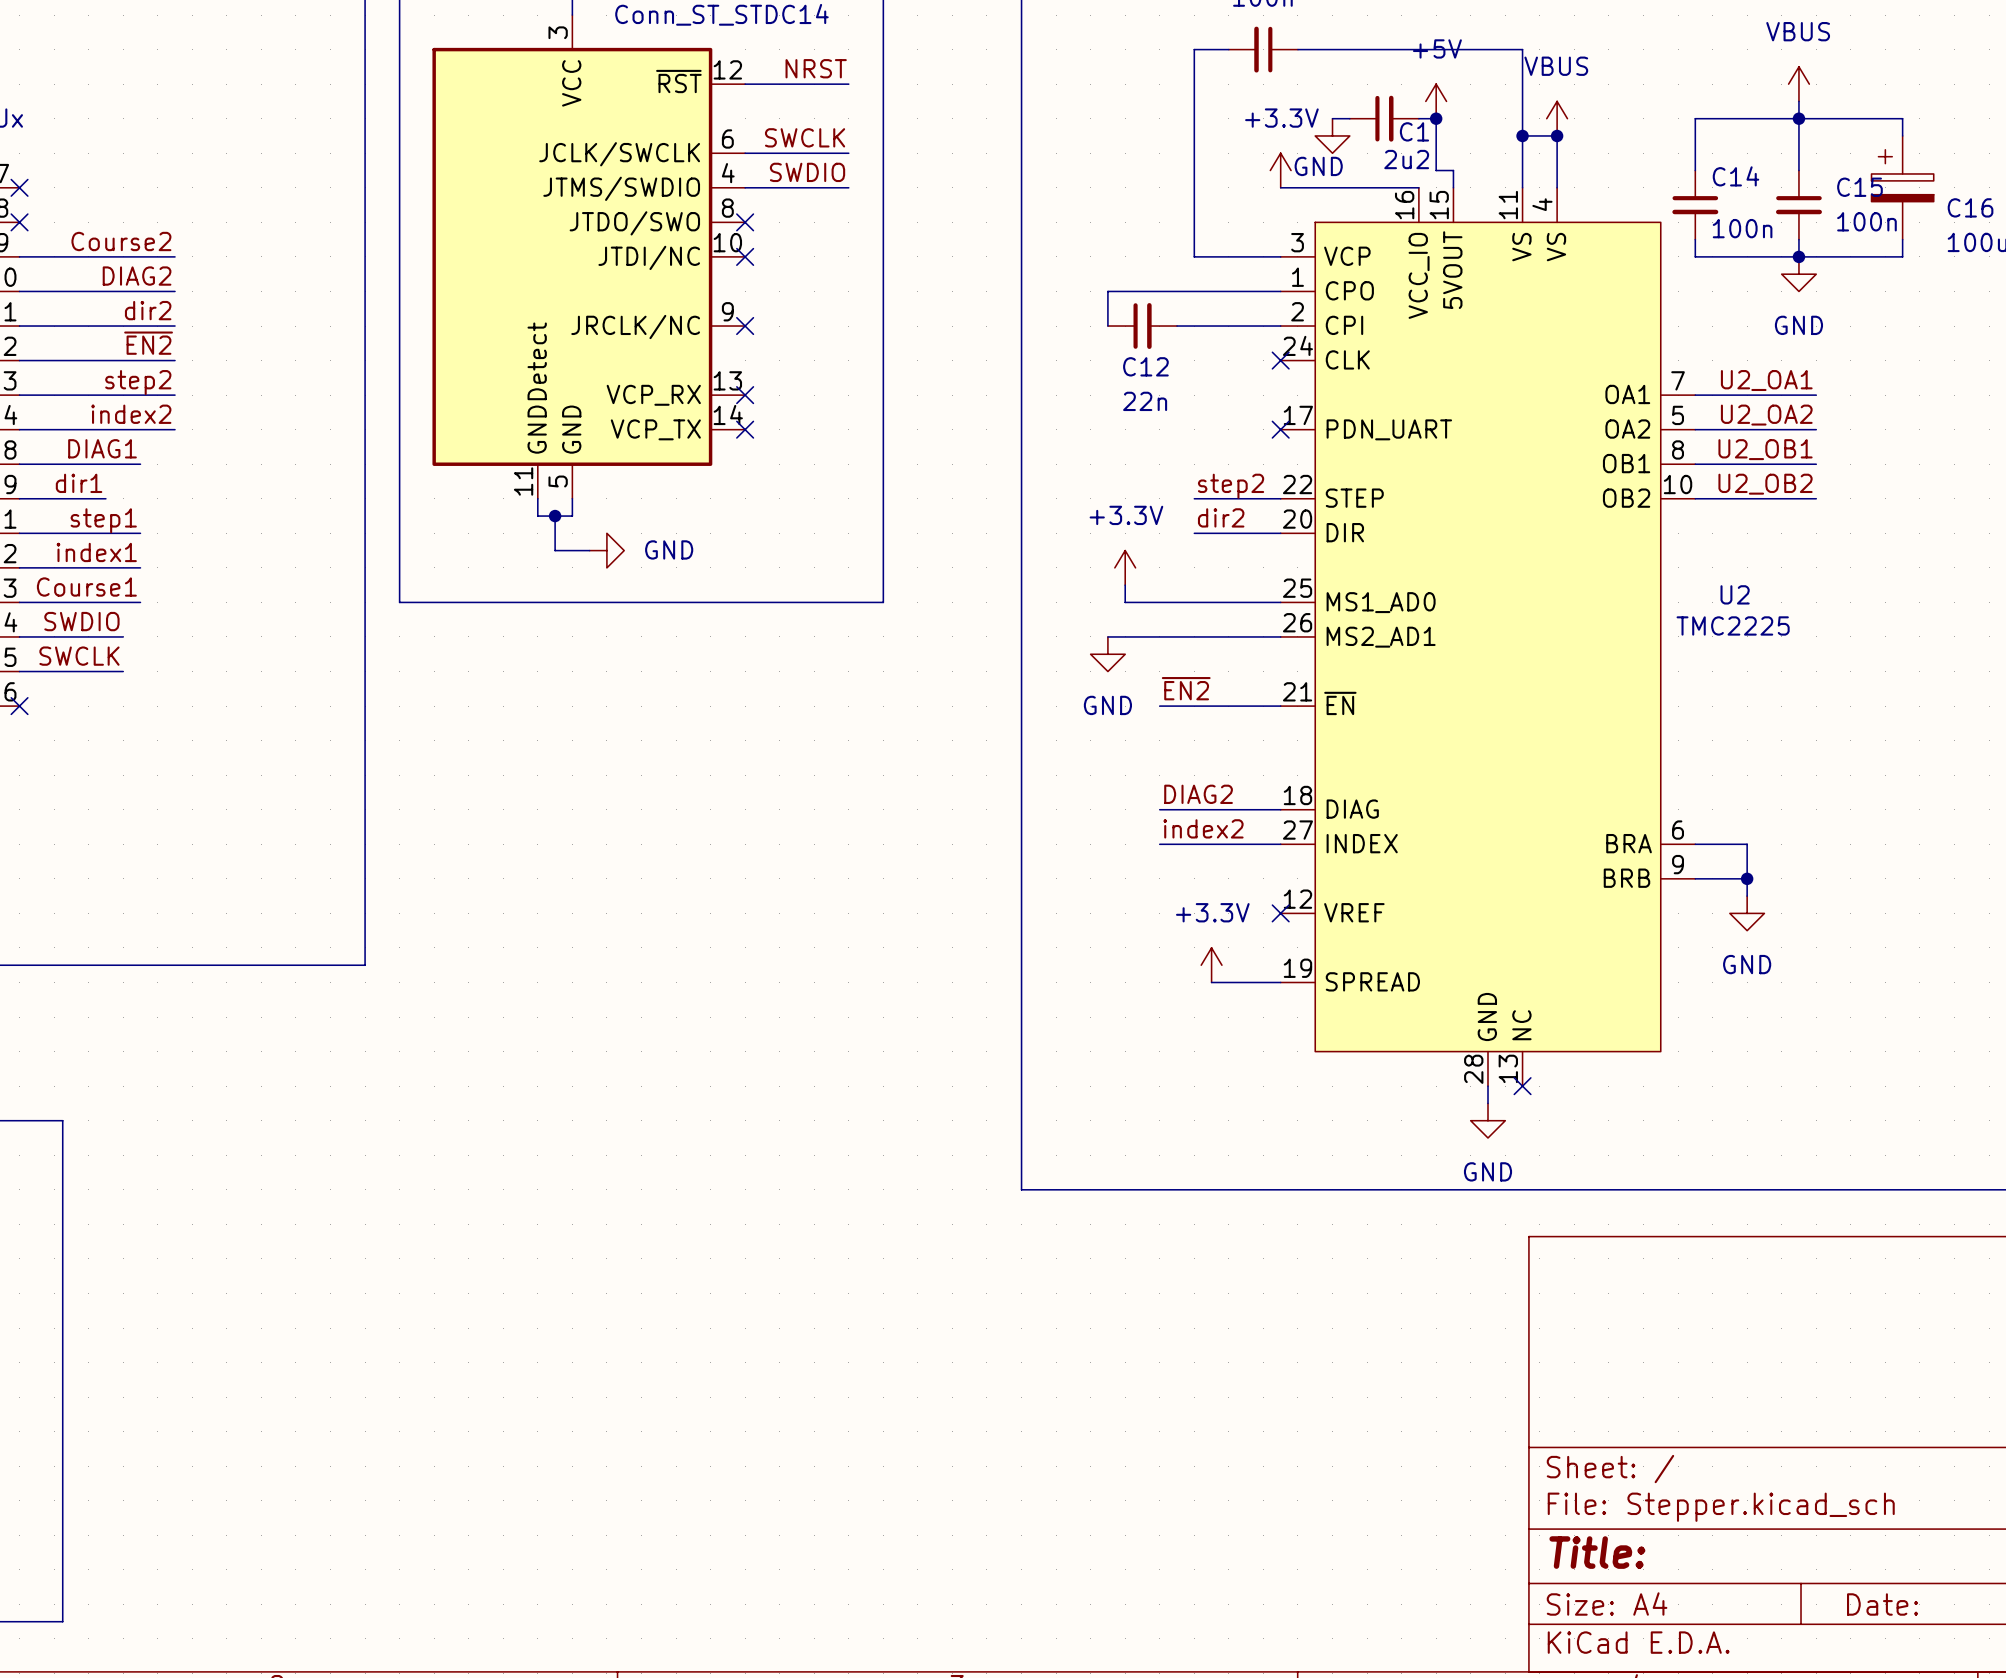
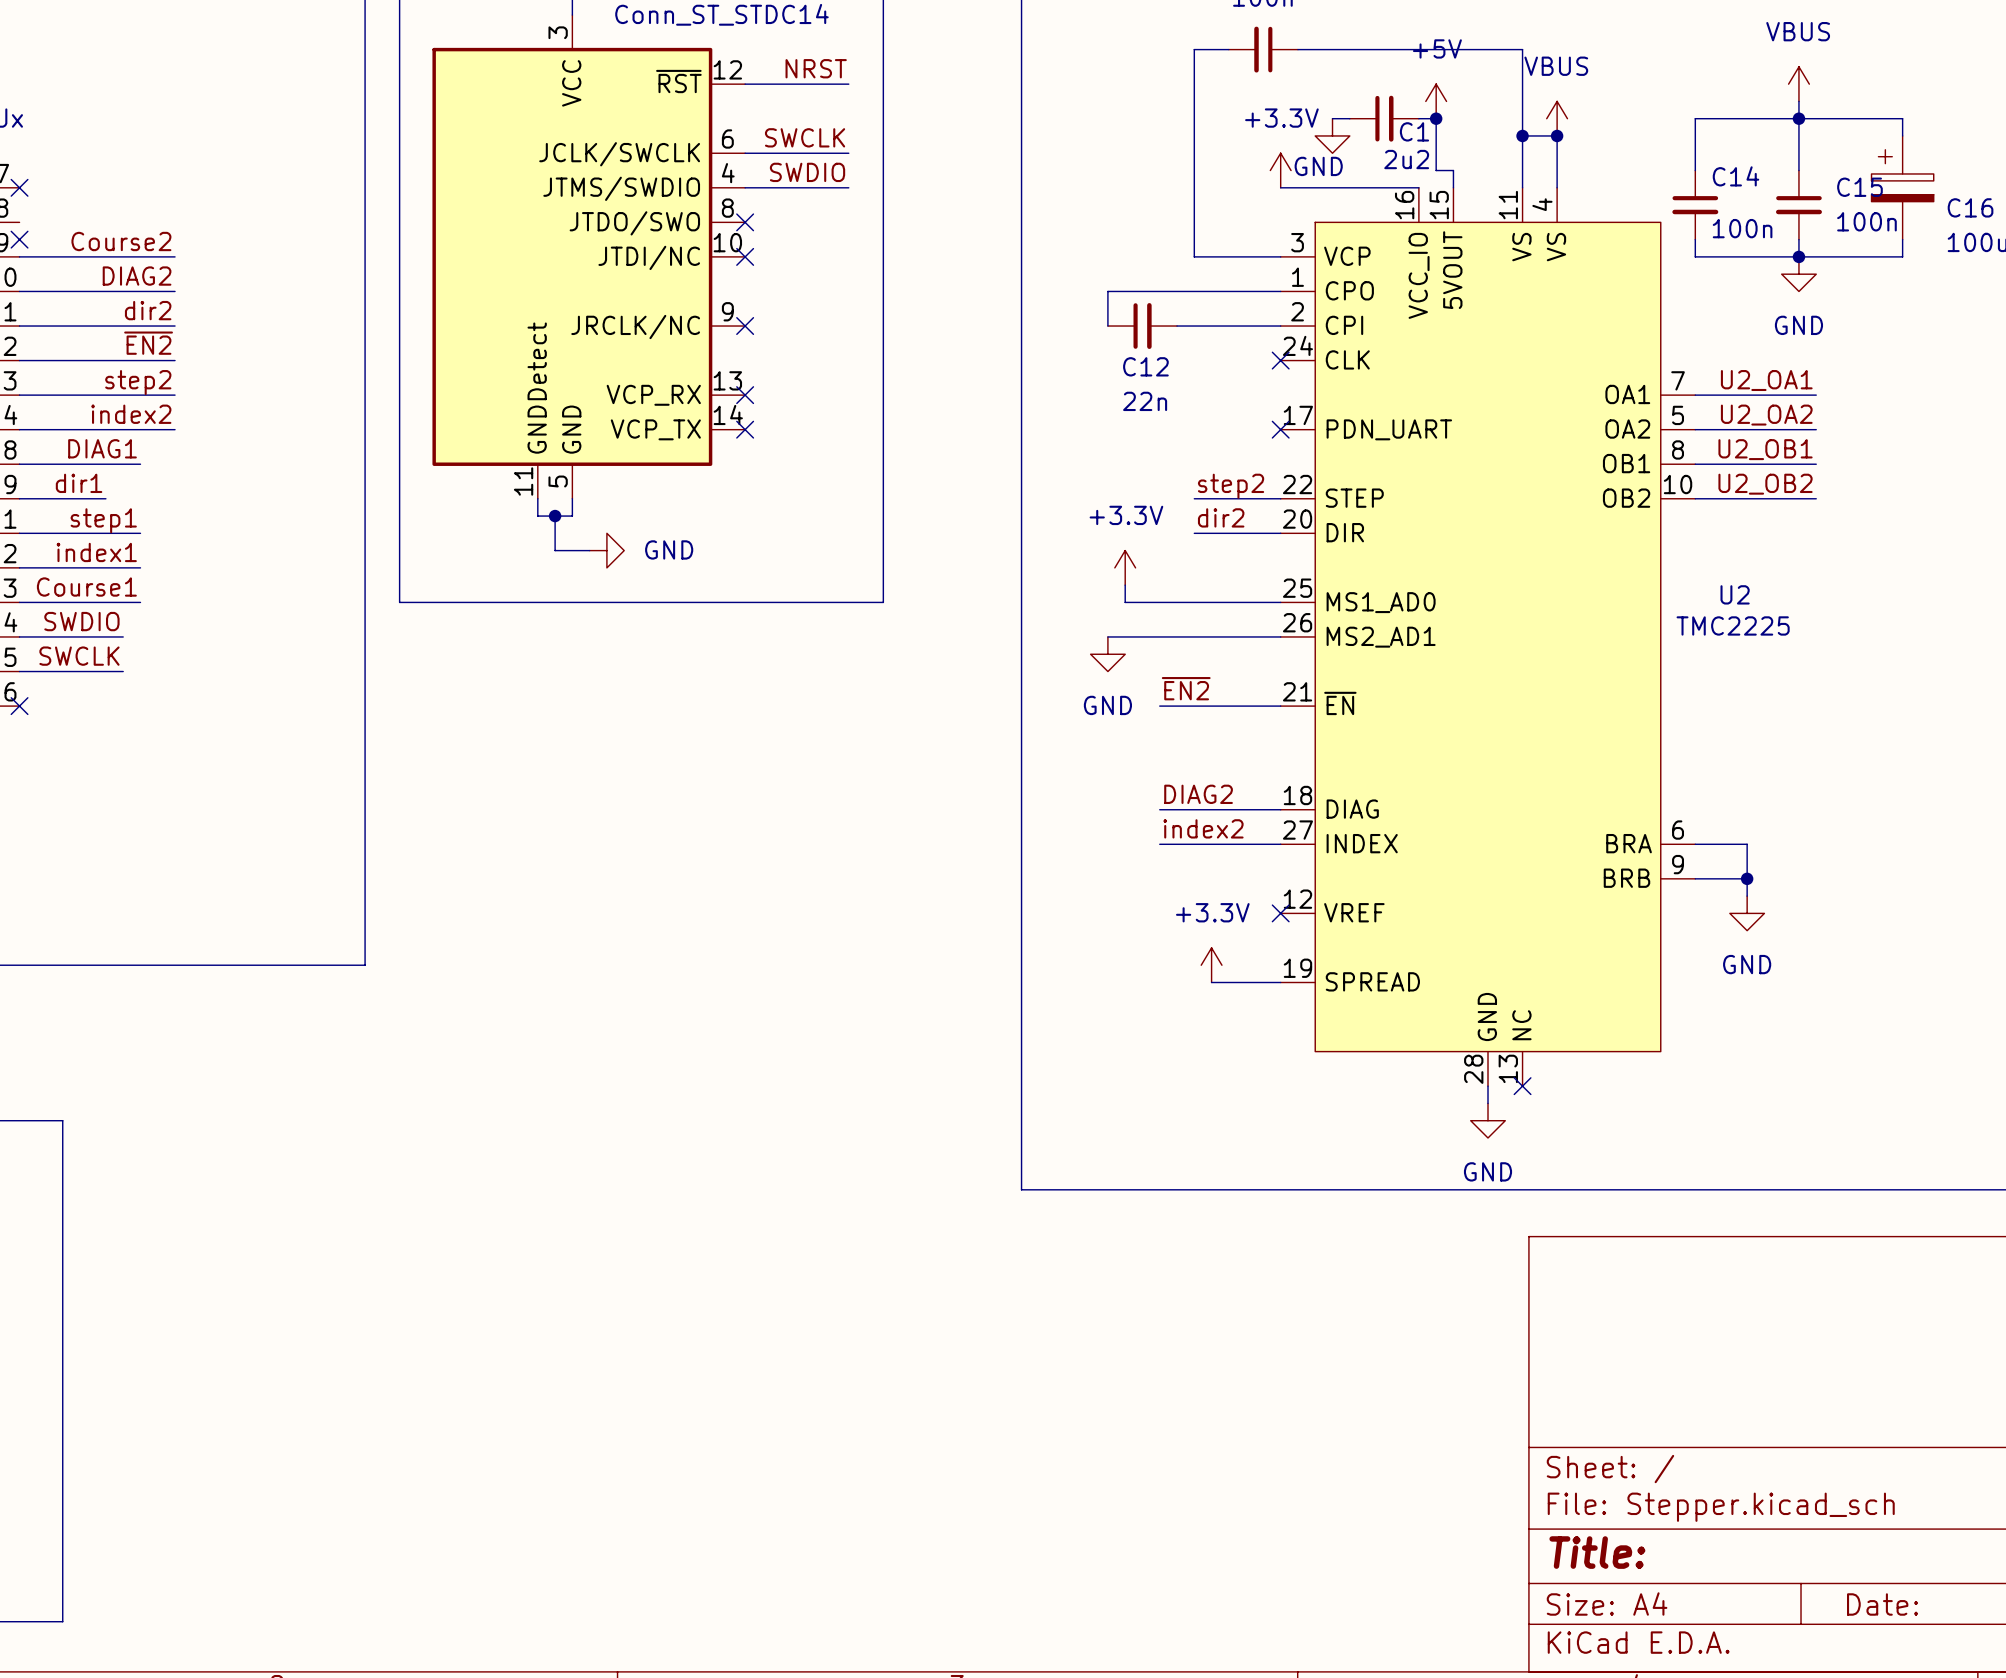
no-connect mark position: (19, 222) -> (19, 239)

